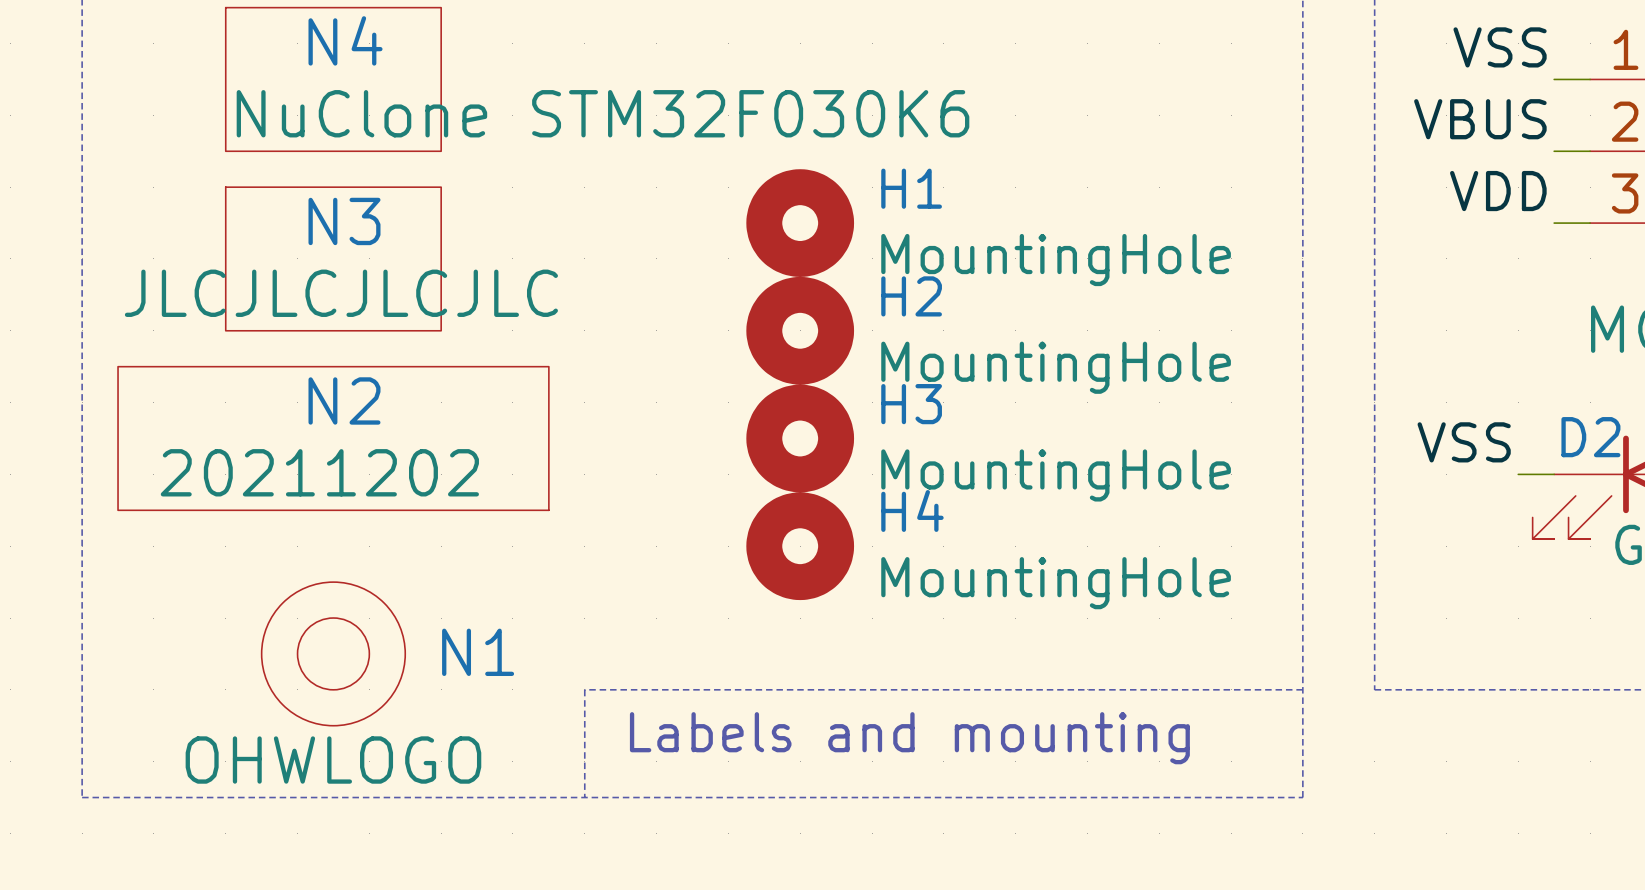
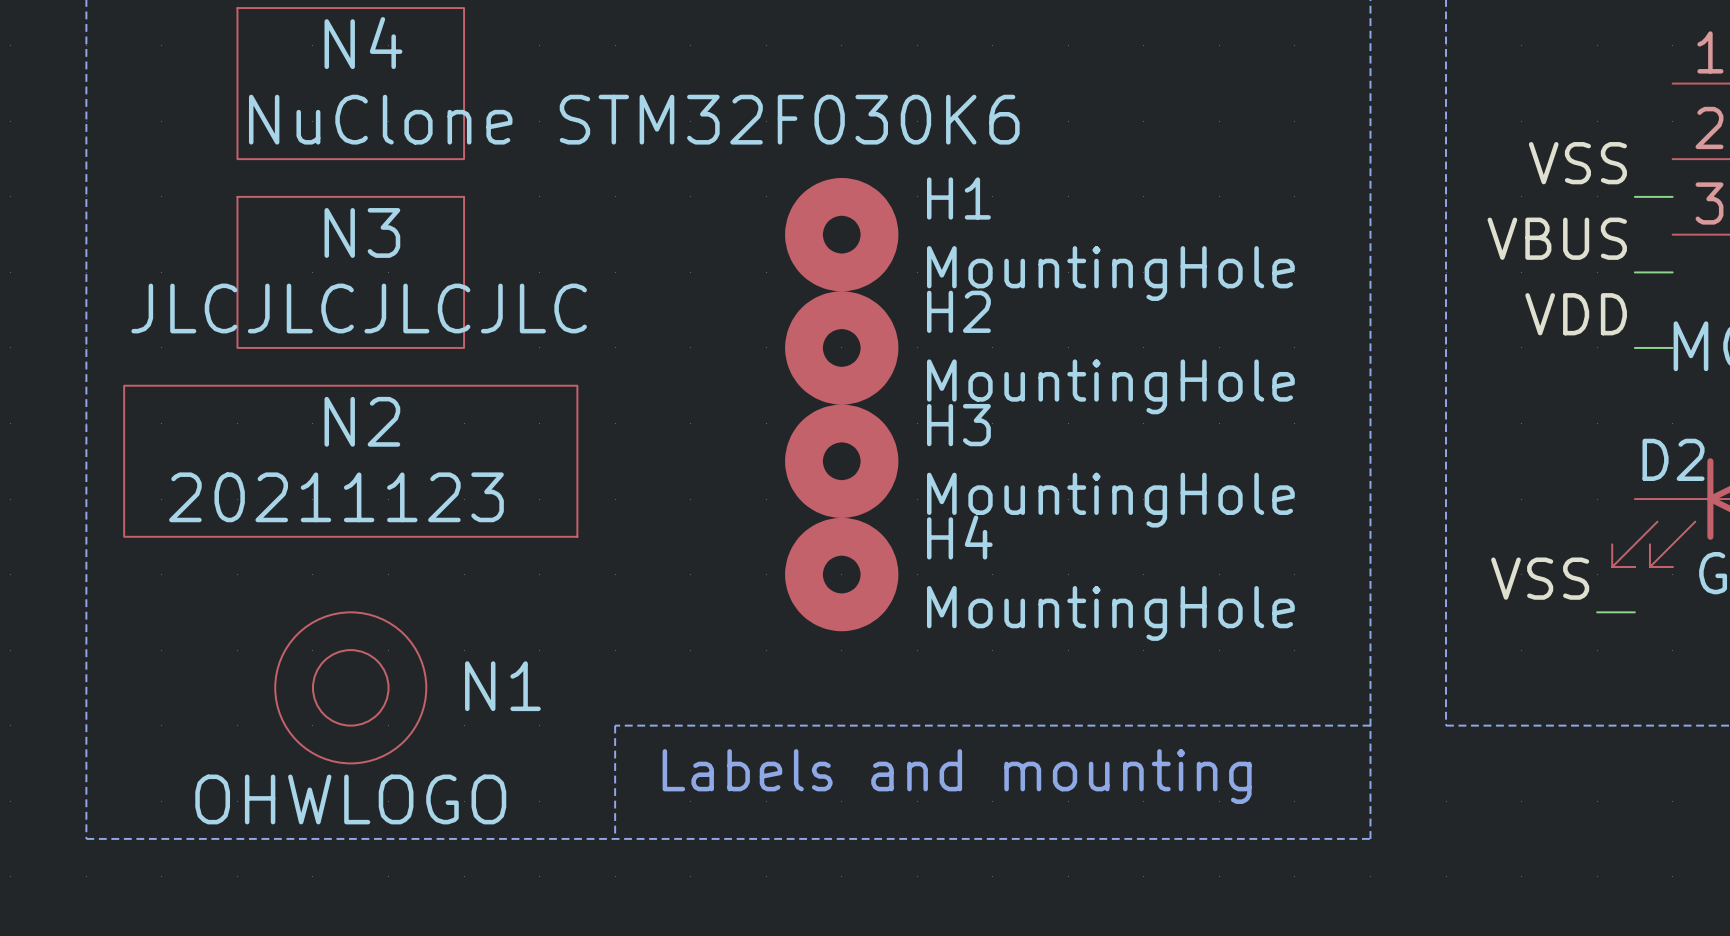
label: VSS (1500, 47) -> none
wire: (1554, 79) (1590, 79) -> (1634, 196) (1672, 196)
label position: VBUS (1480, 119) -> VBUS (1557, 238)
wire: (1554, 151) (1590, 151) -> (1634, 272) (1672, 272)
label: none -> VSS (1577, 163)
label position: VDD (1498, 191) -> VDD (1576, 314)
wire: (1554, 223) (1590, 223) -> (1634, 347) (1672, 347)
label position: VSS (1464, 442) -> VSS (1540, 578)
N2 value: 20211202 (319, 472) -> 20211123 (336, 497)
wire: (1518, 474) (1554, 474) -> (1597, 612) (1634, 612)

